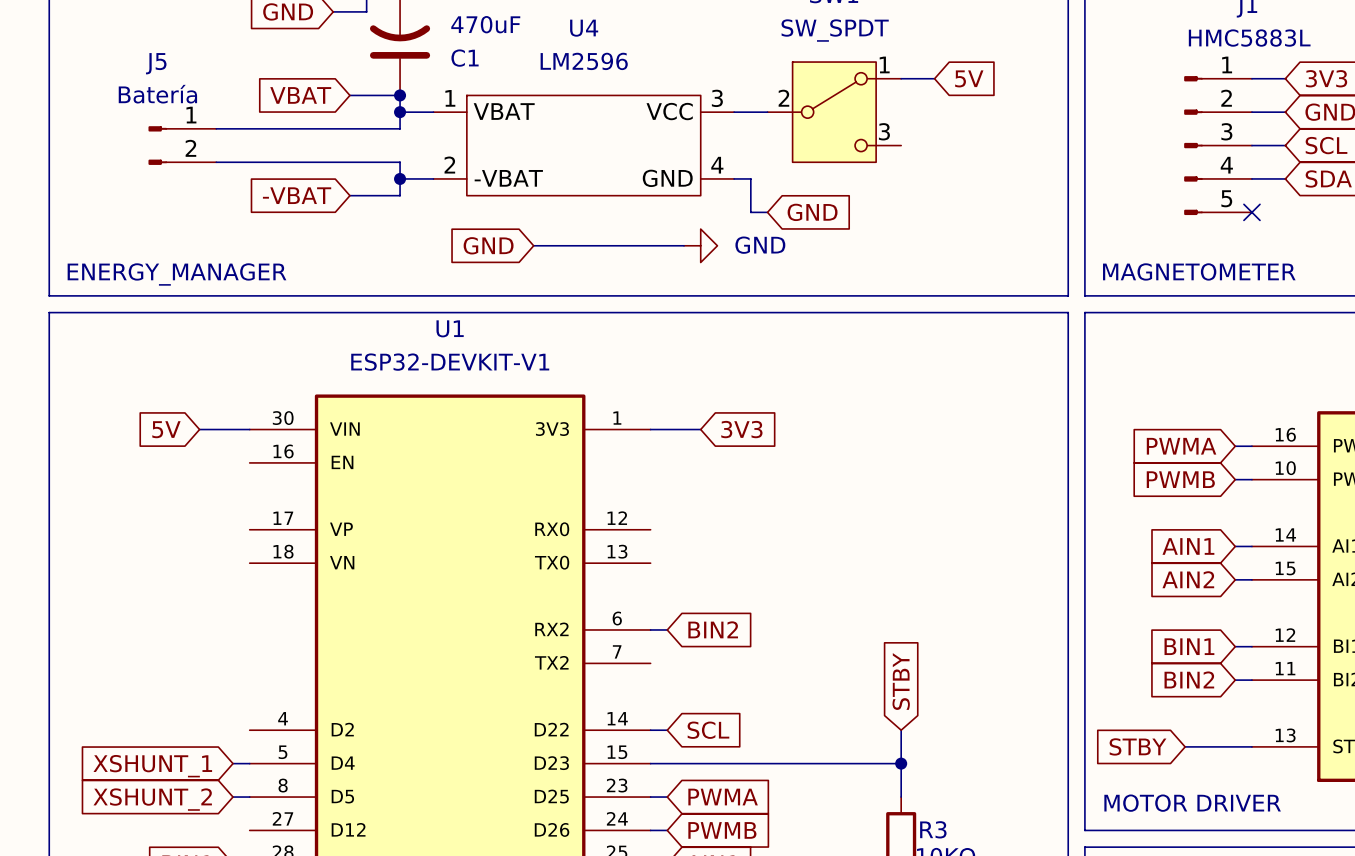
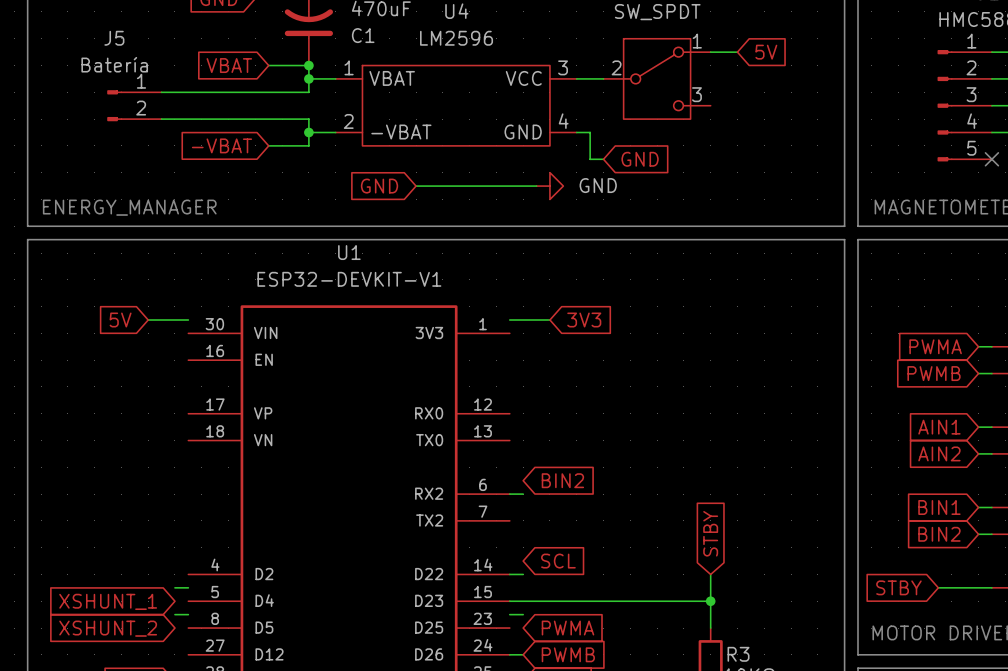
global label position: 5V (166, 429) -> 5V (120, 320)
wire: (199, 429) (249, 429) -> (148, 320) (188, 320)
wire: (650, 429) (700, 429) -> (509, 320) (549, 320)
global label position: 3V3 (741, 429) -> 3V3 (584, 320)
global label position: BIN2 (713, 629) -> BIN2 (562, 480)
global label position: SCL (708, 730) -> SCL (558, 561)
wire: (233, 763) (249, 763) -> (174, 587) (188, 587)
wire: (233, 797) (249, 797) -> (174, 614) (188, 614)
wire: (650, 797) (667, 797) -> (509, 614) (523, 614)

